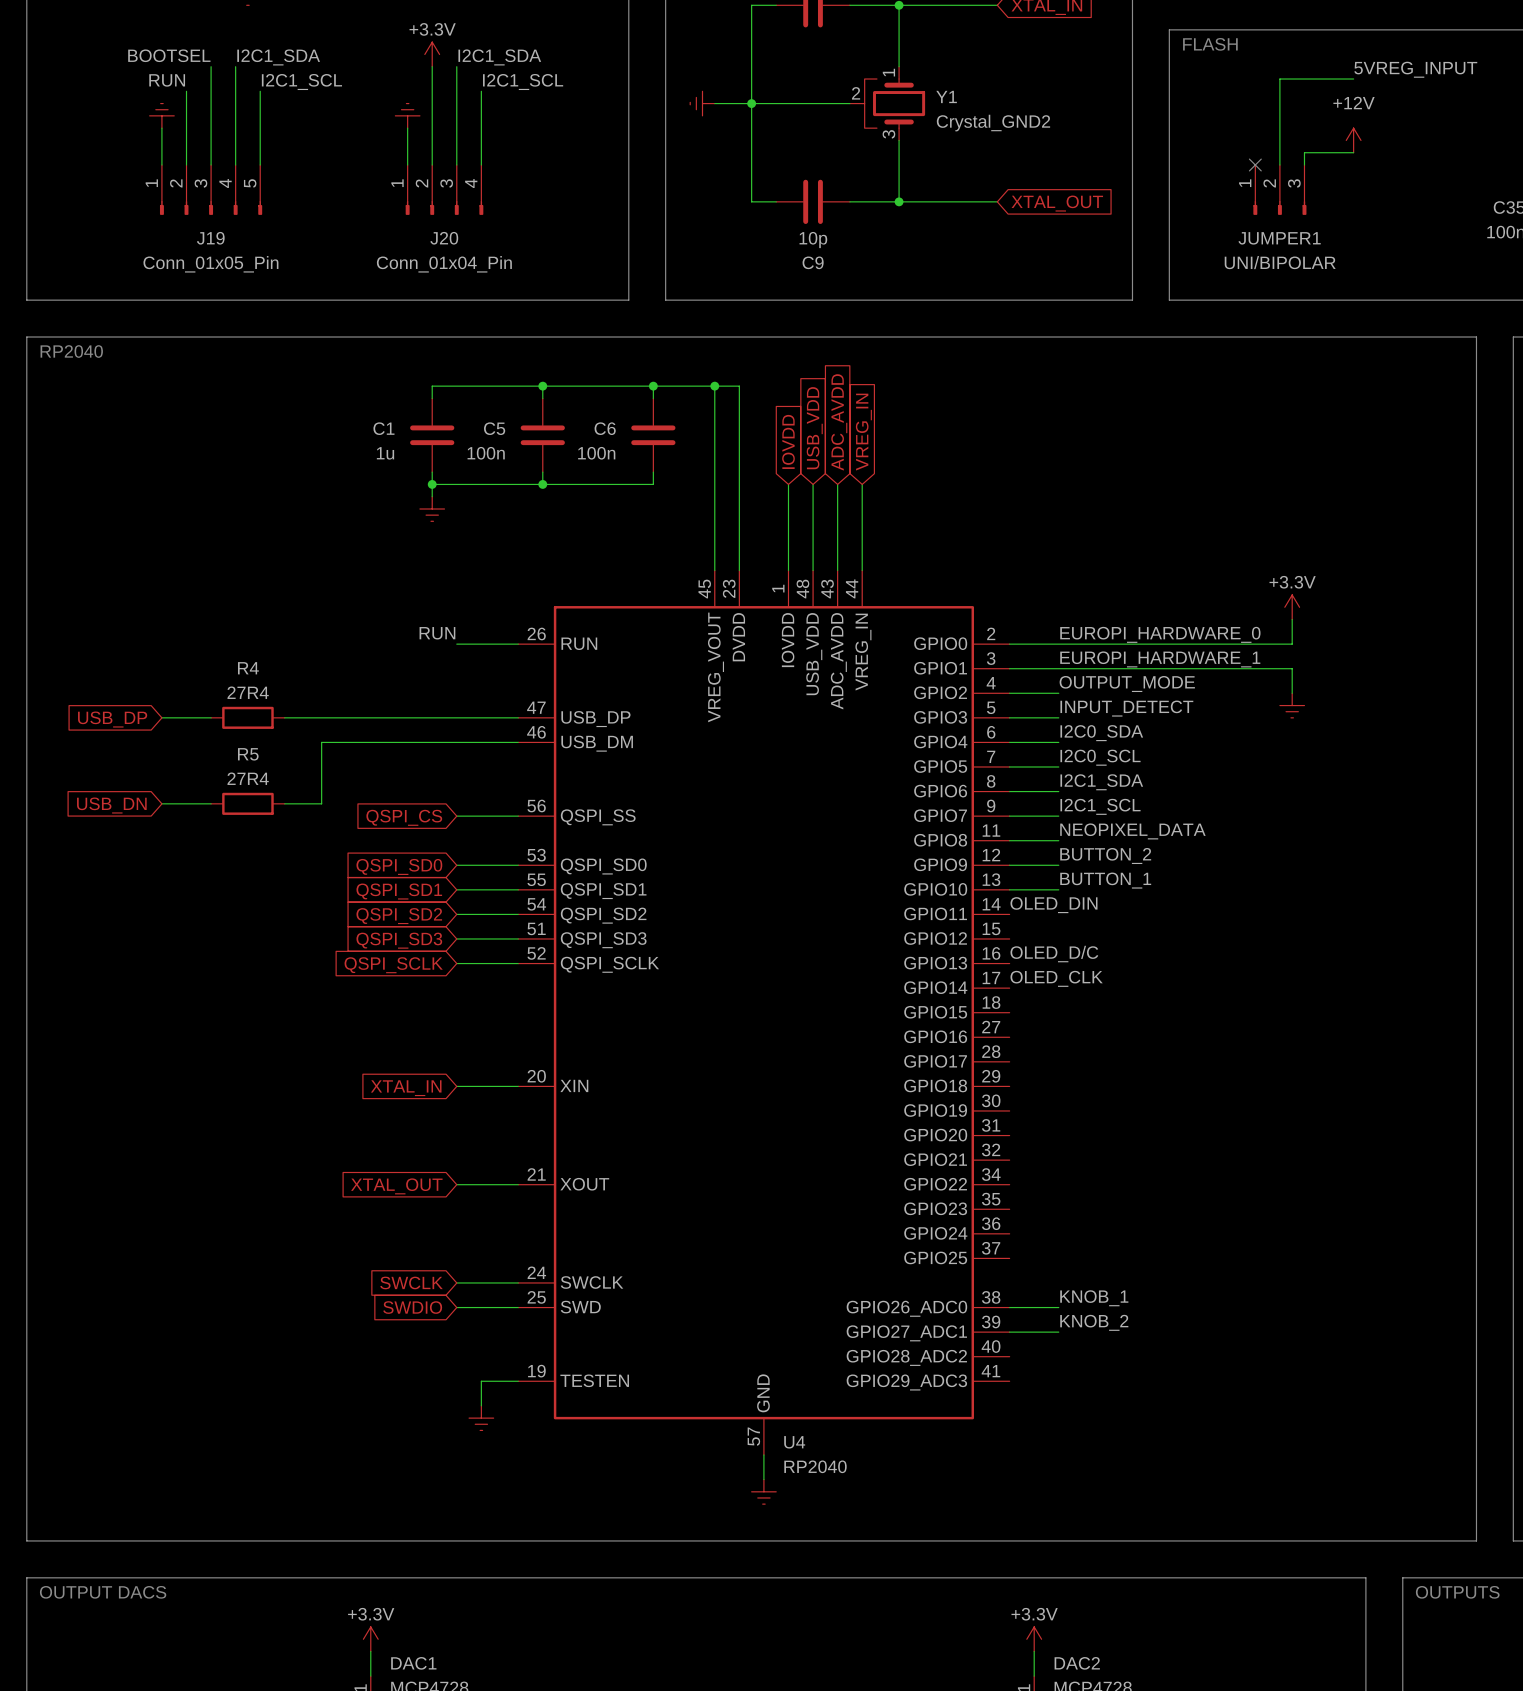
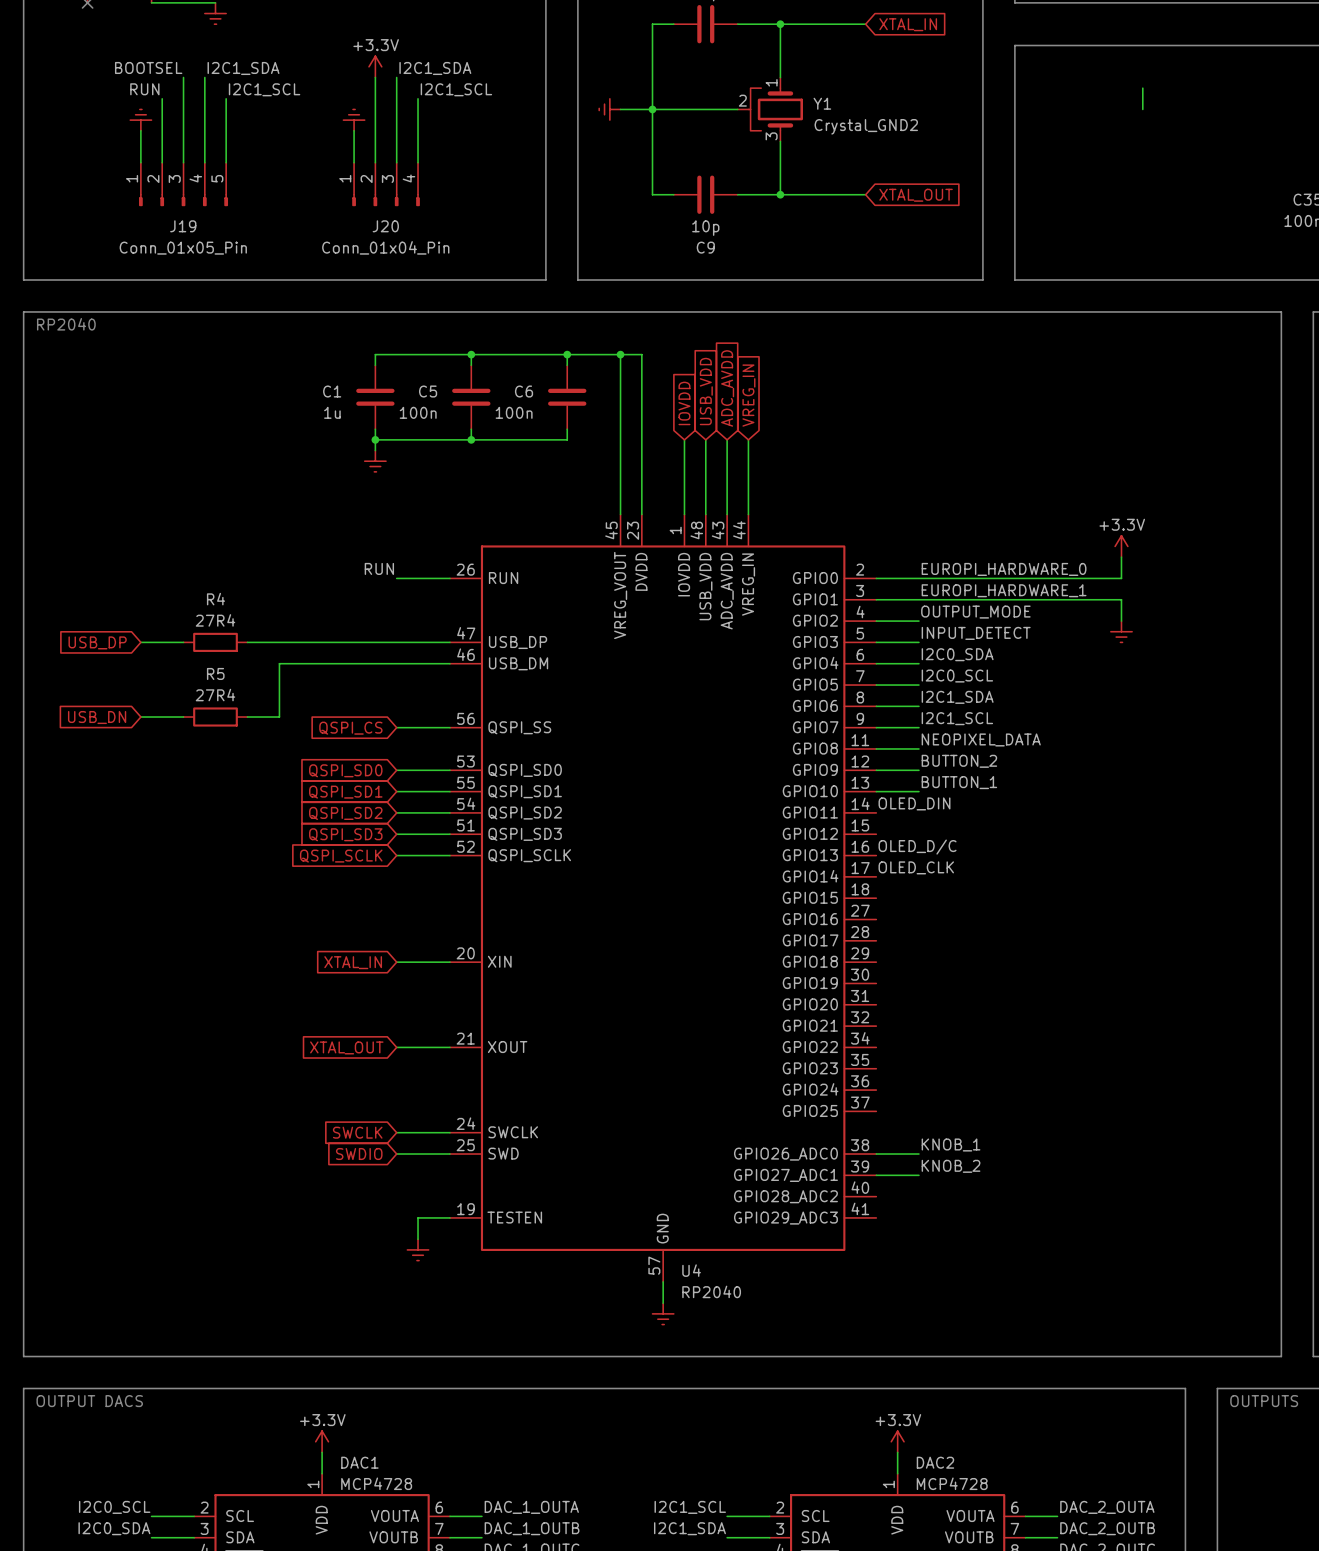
text: FLASH (1210, 44) -> none
label: 5VREG_INPUT (1415, 69) -> none
wire: none -> (1142, 88) (1142, 109)
wire: (1353, 79) (1279, 79) (1279, 165) -> none
power symbol: +12V (1353, 140) -> none
wire: (1353, 152) (1304, 152) (1304, 165) -> none
no-connect mark: (1255, 165) -> none
JUMPER1: UNI/BIPOLAR (1279, 189) -> none

